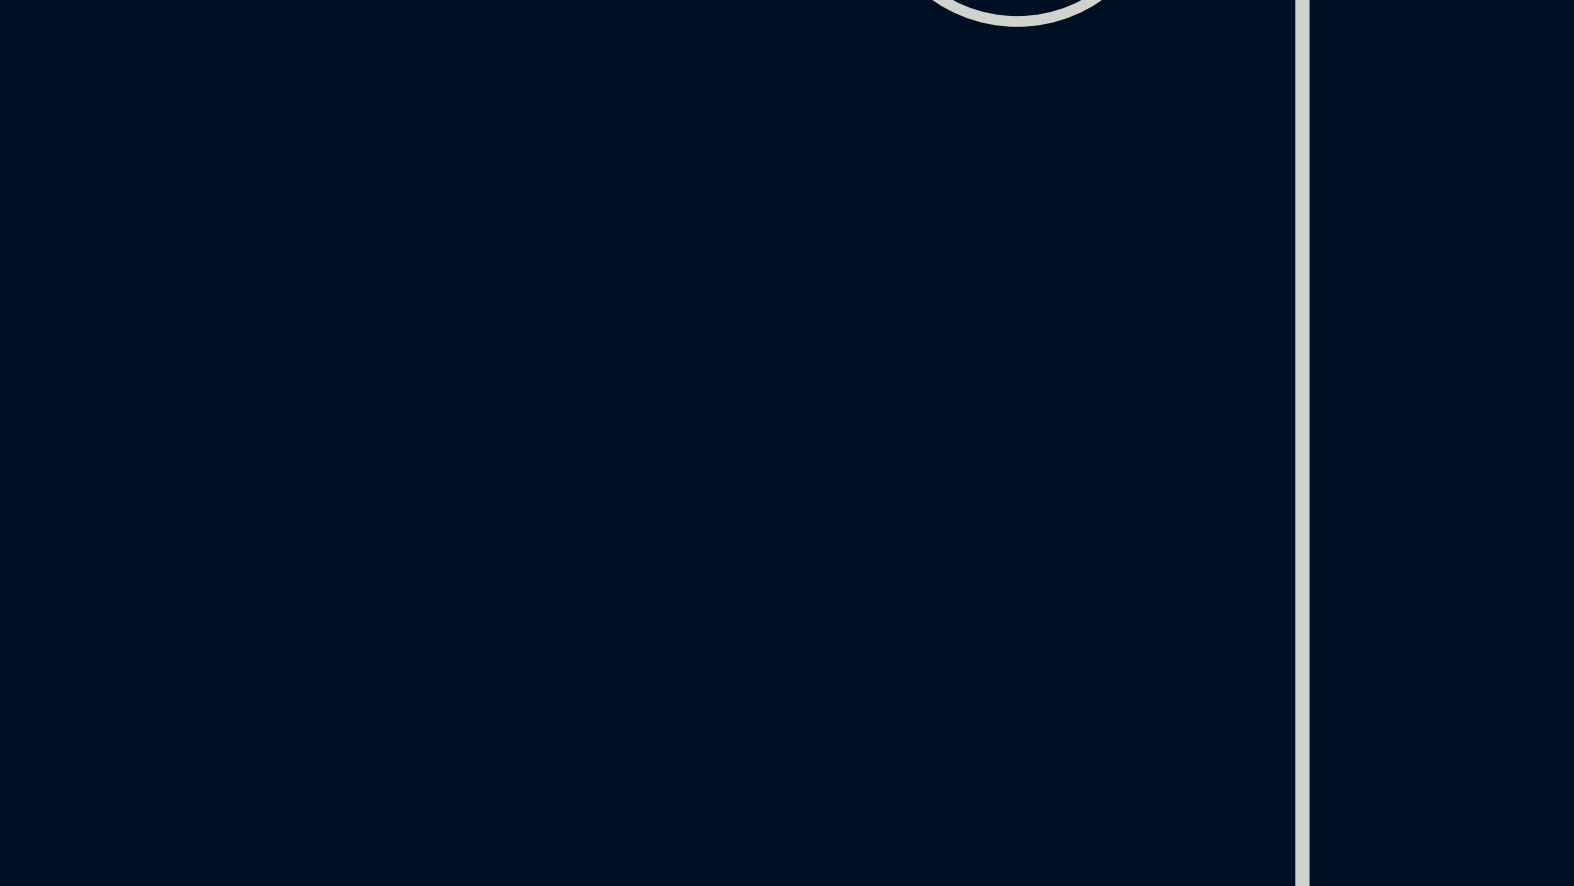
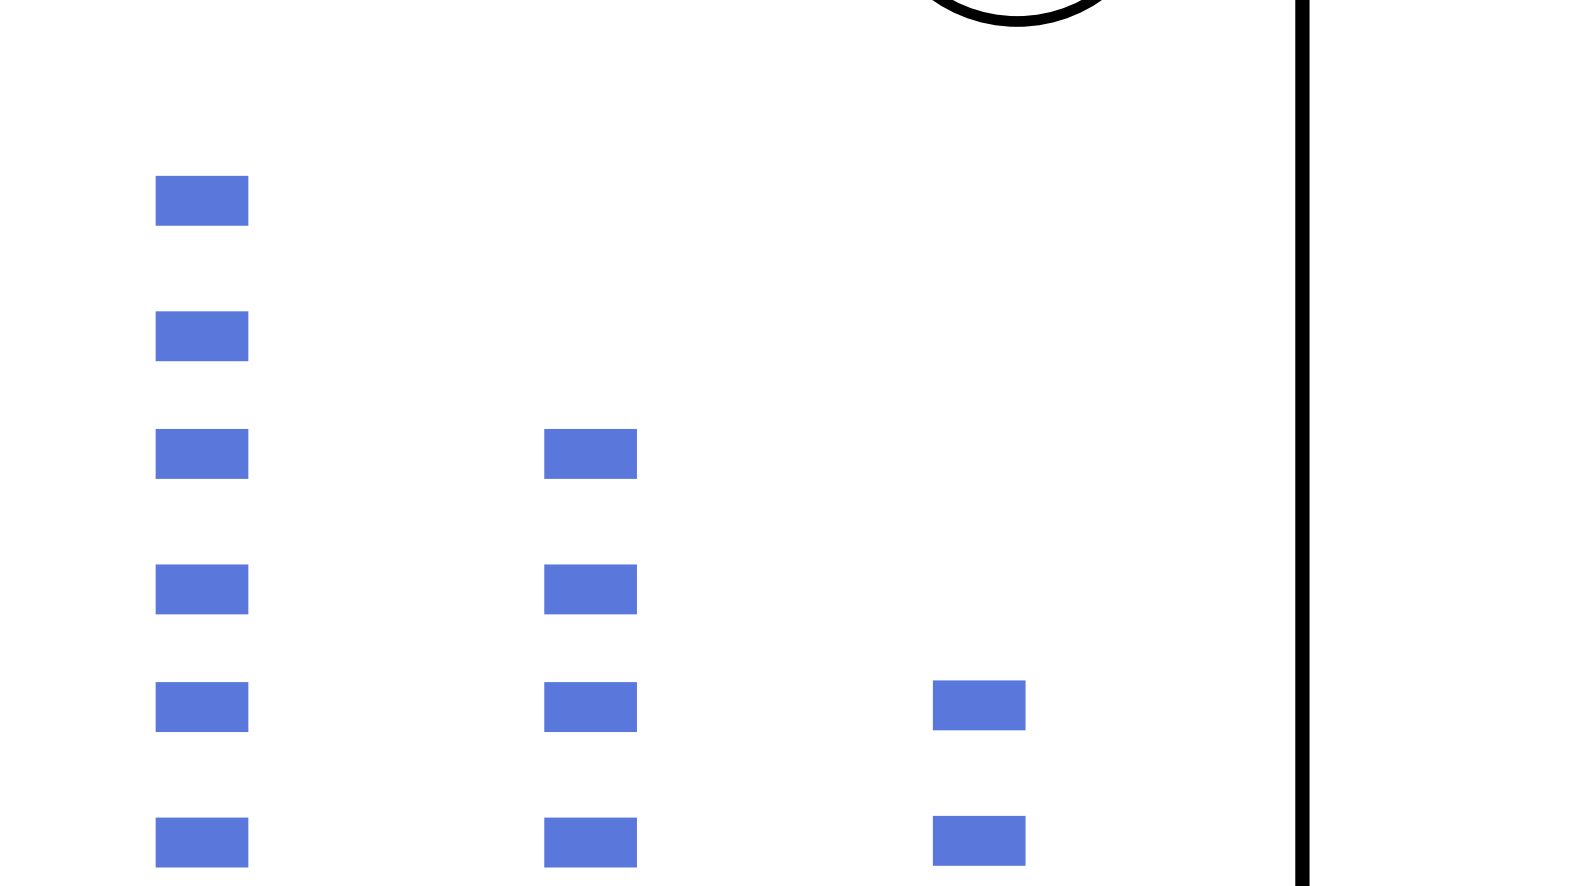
part: none -> (202, 268)
part: none -> (202, 521)
part: none -> (590, 521)
part: none -> (979, 773)
part: none -> (202, 774)
part: none -> (590, 774)

